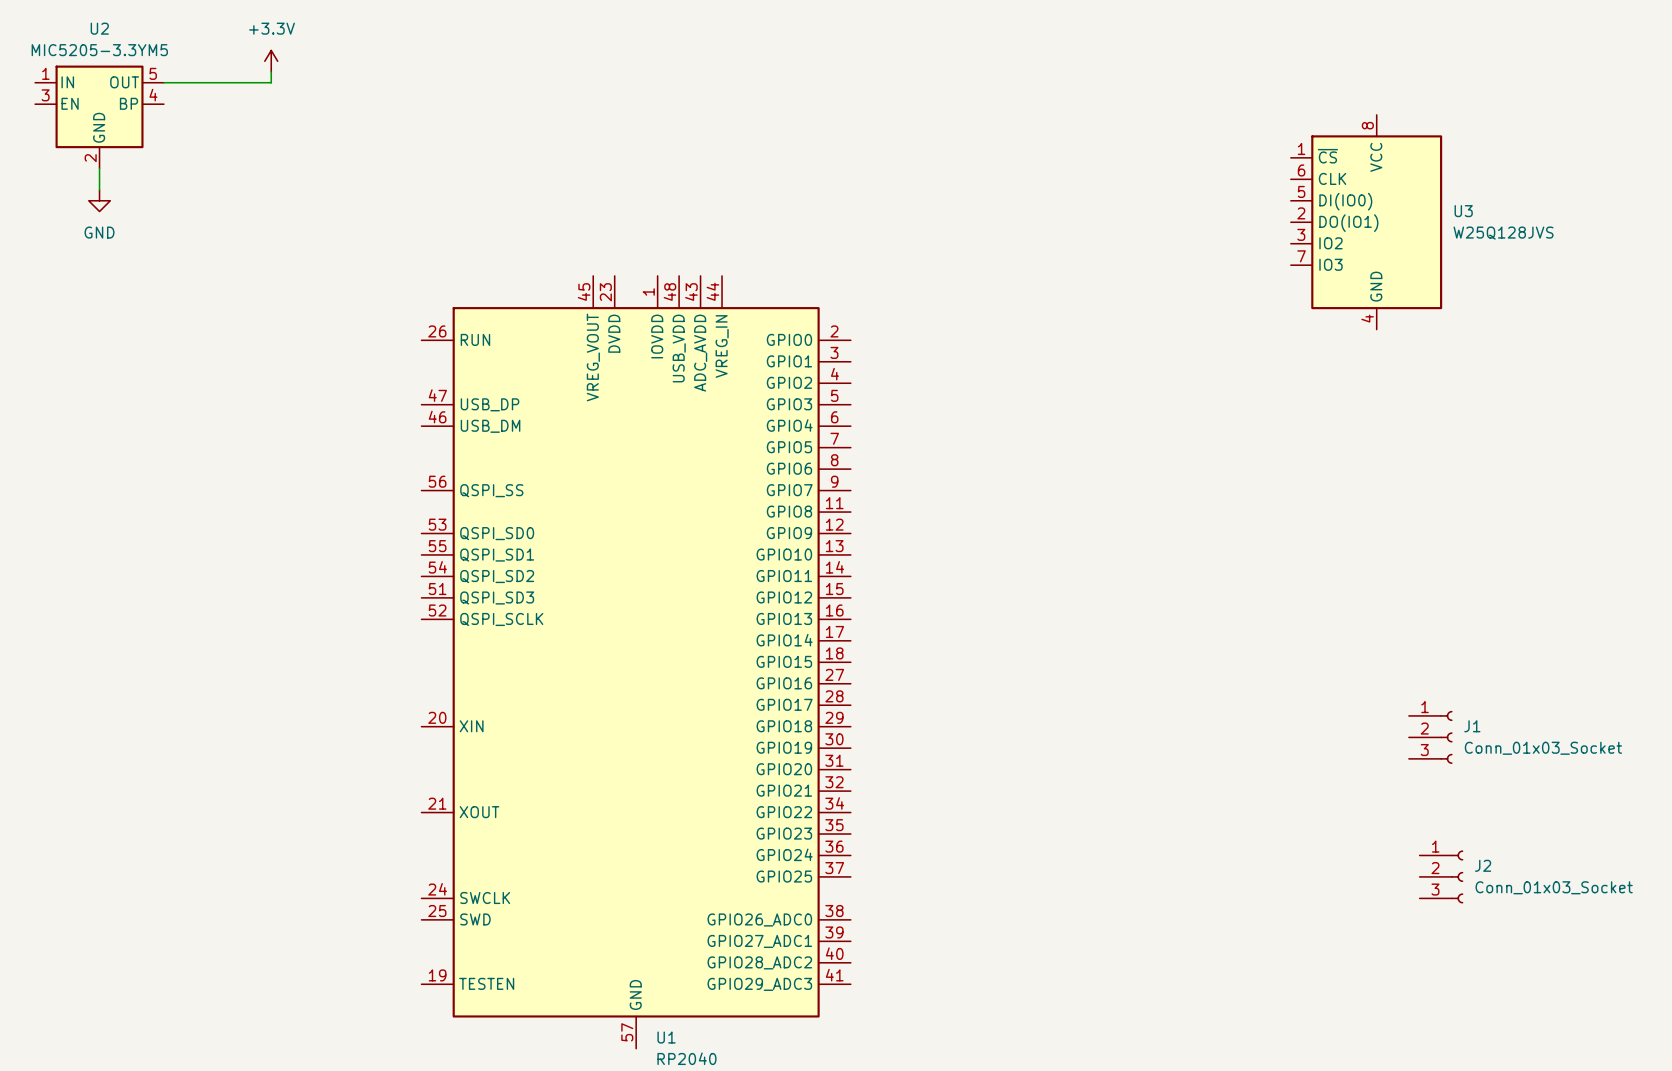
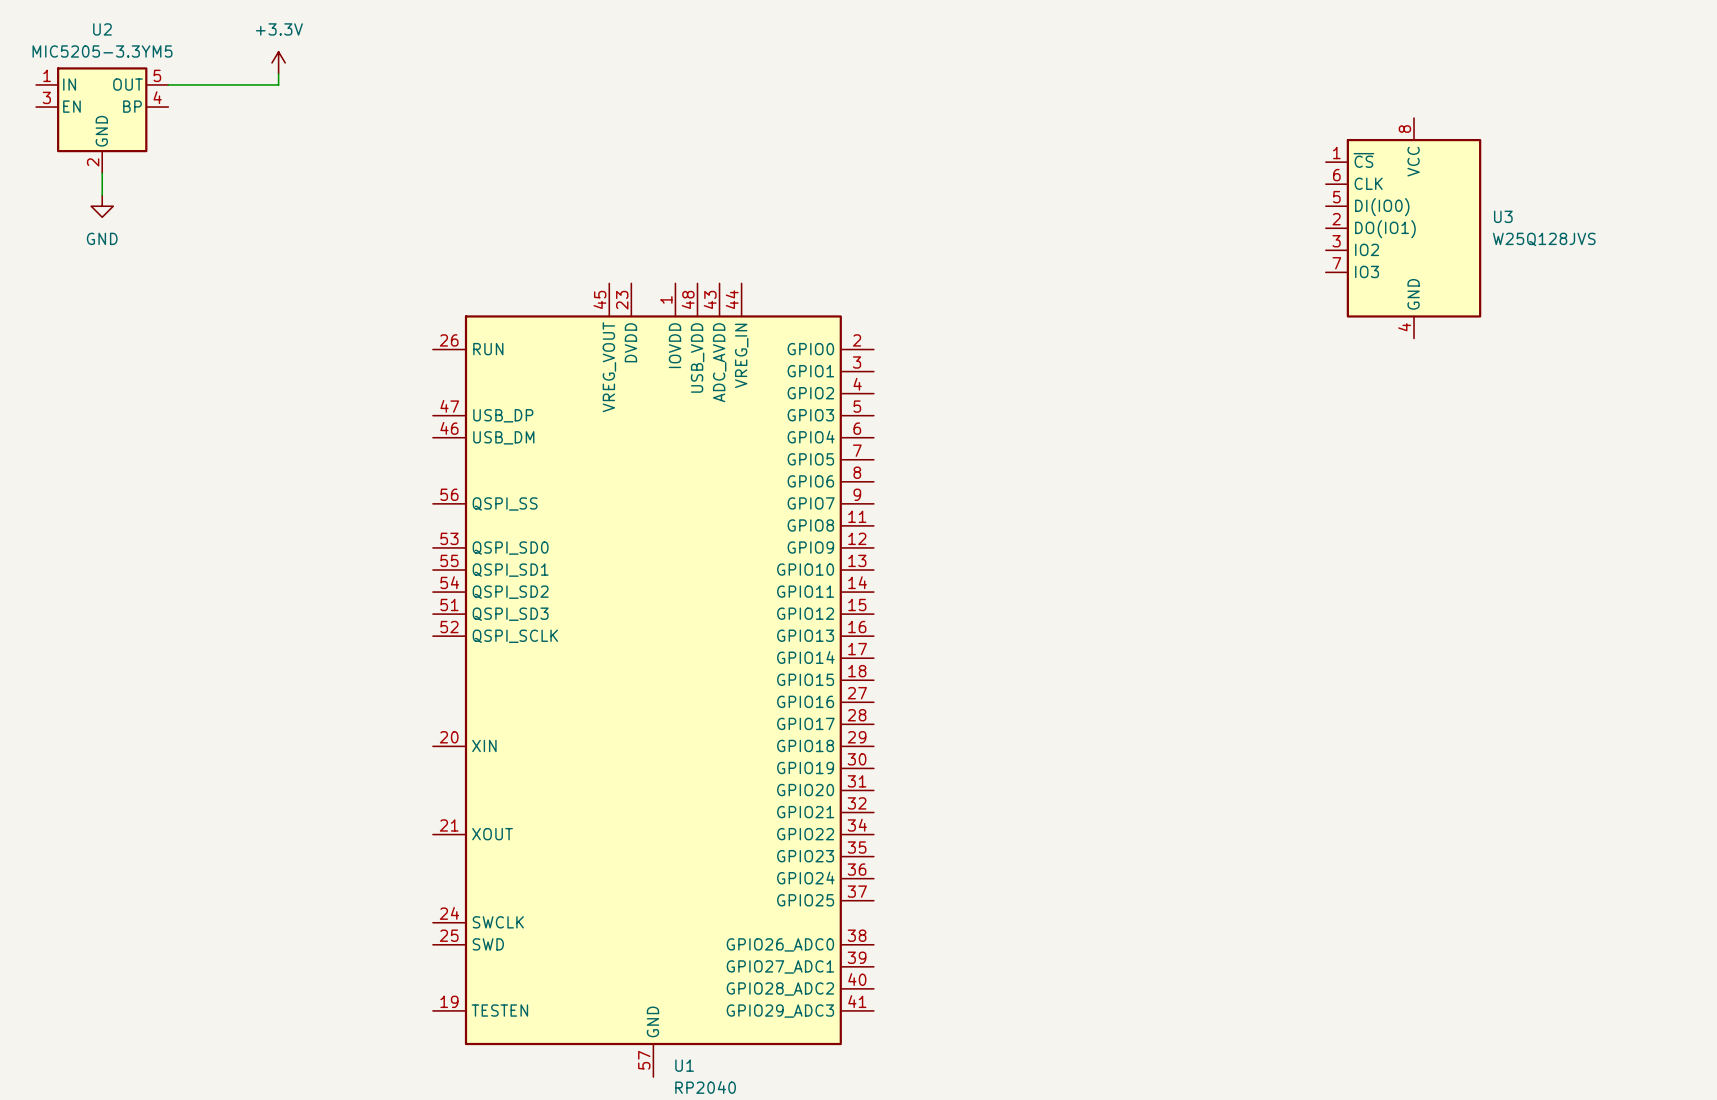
J1: Conn_01x03_Socket (1430, 737) -> none
J2: Conn_01x03_Socket (1441, 876) -> none

